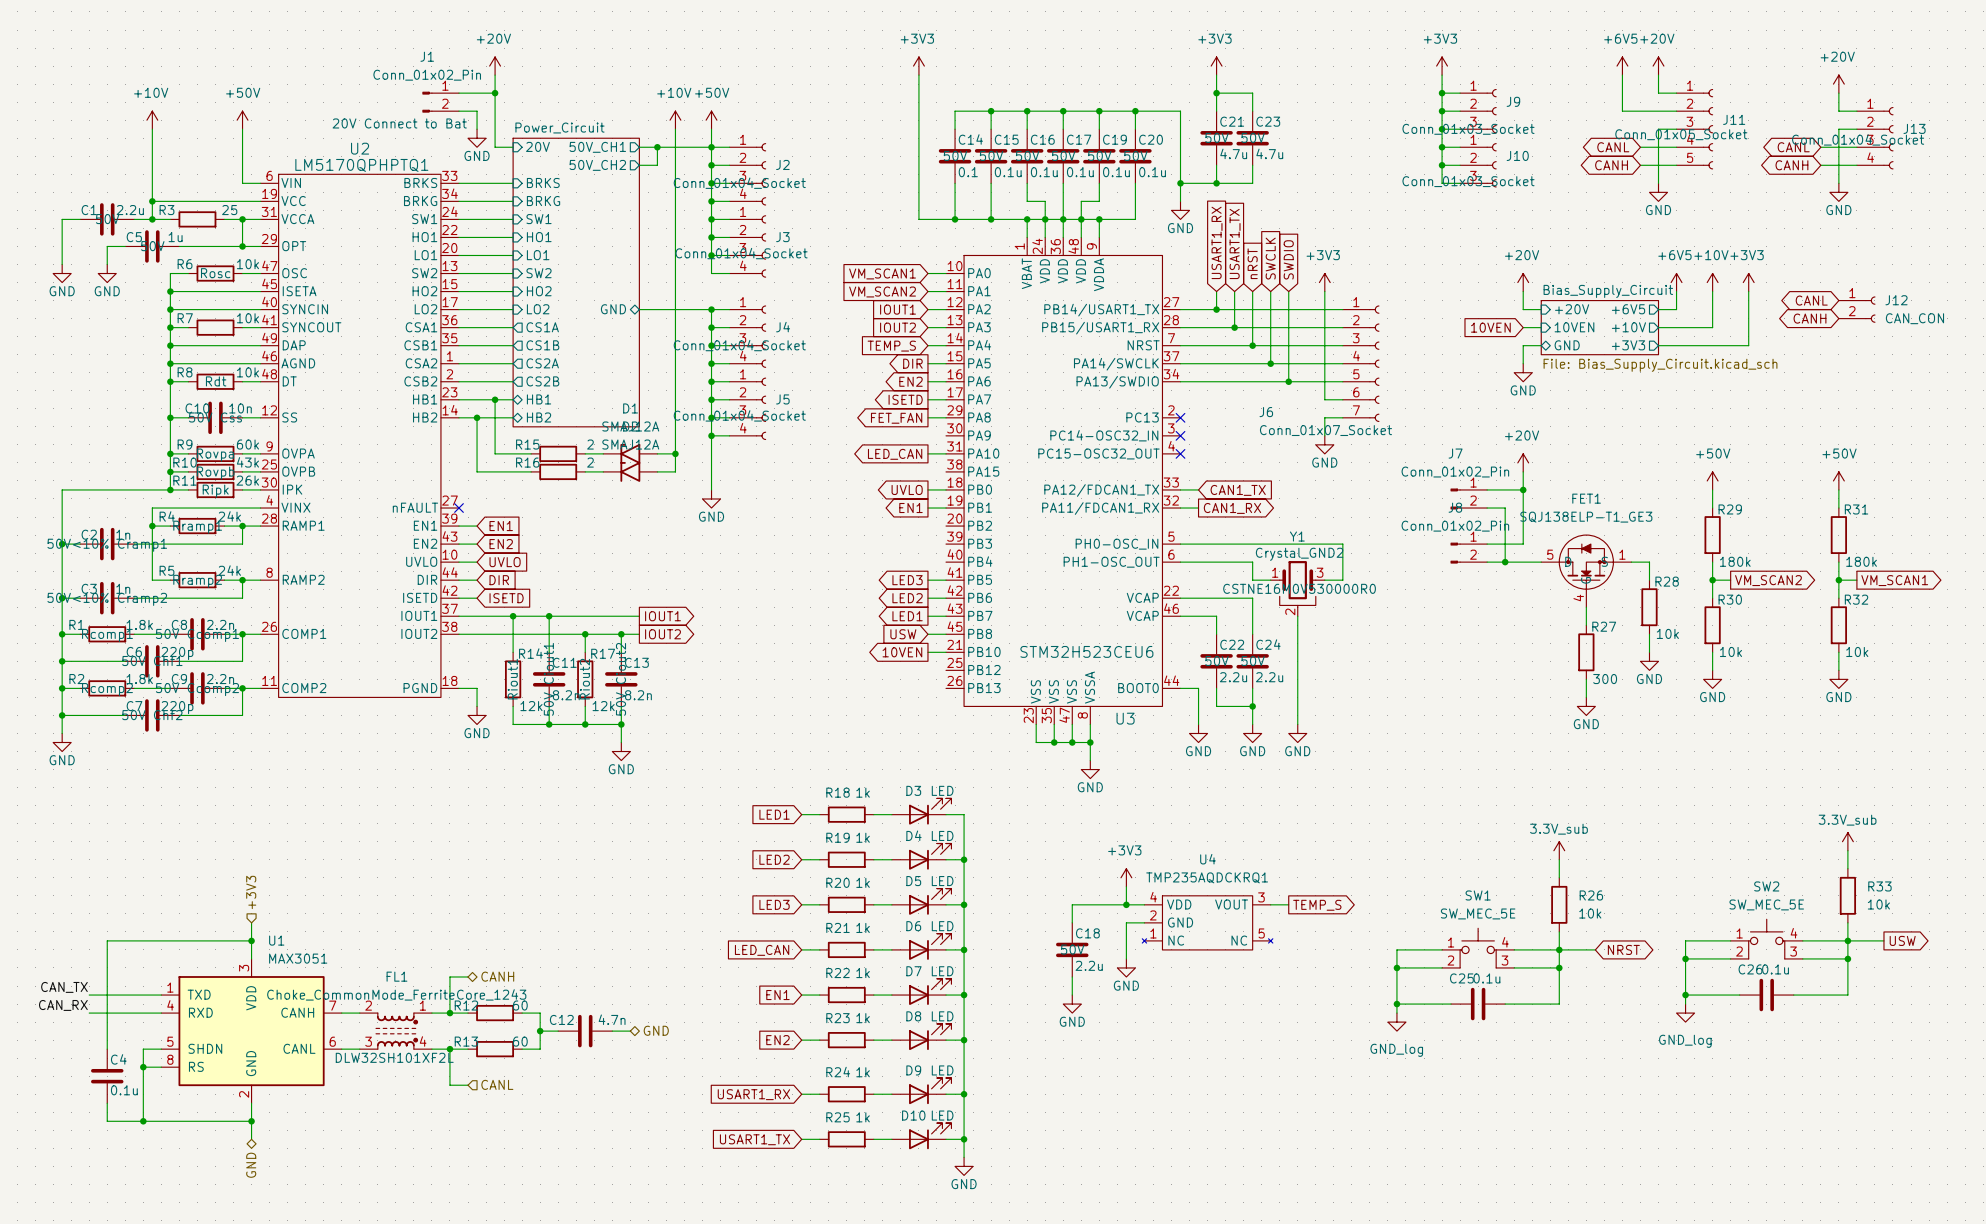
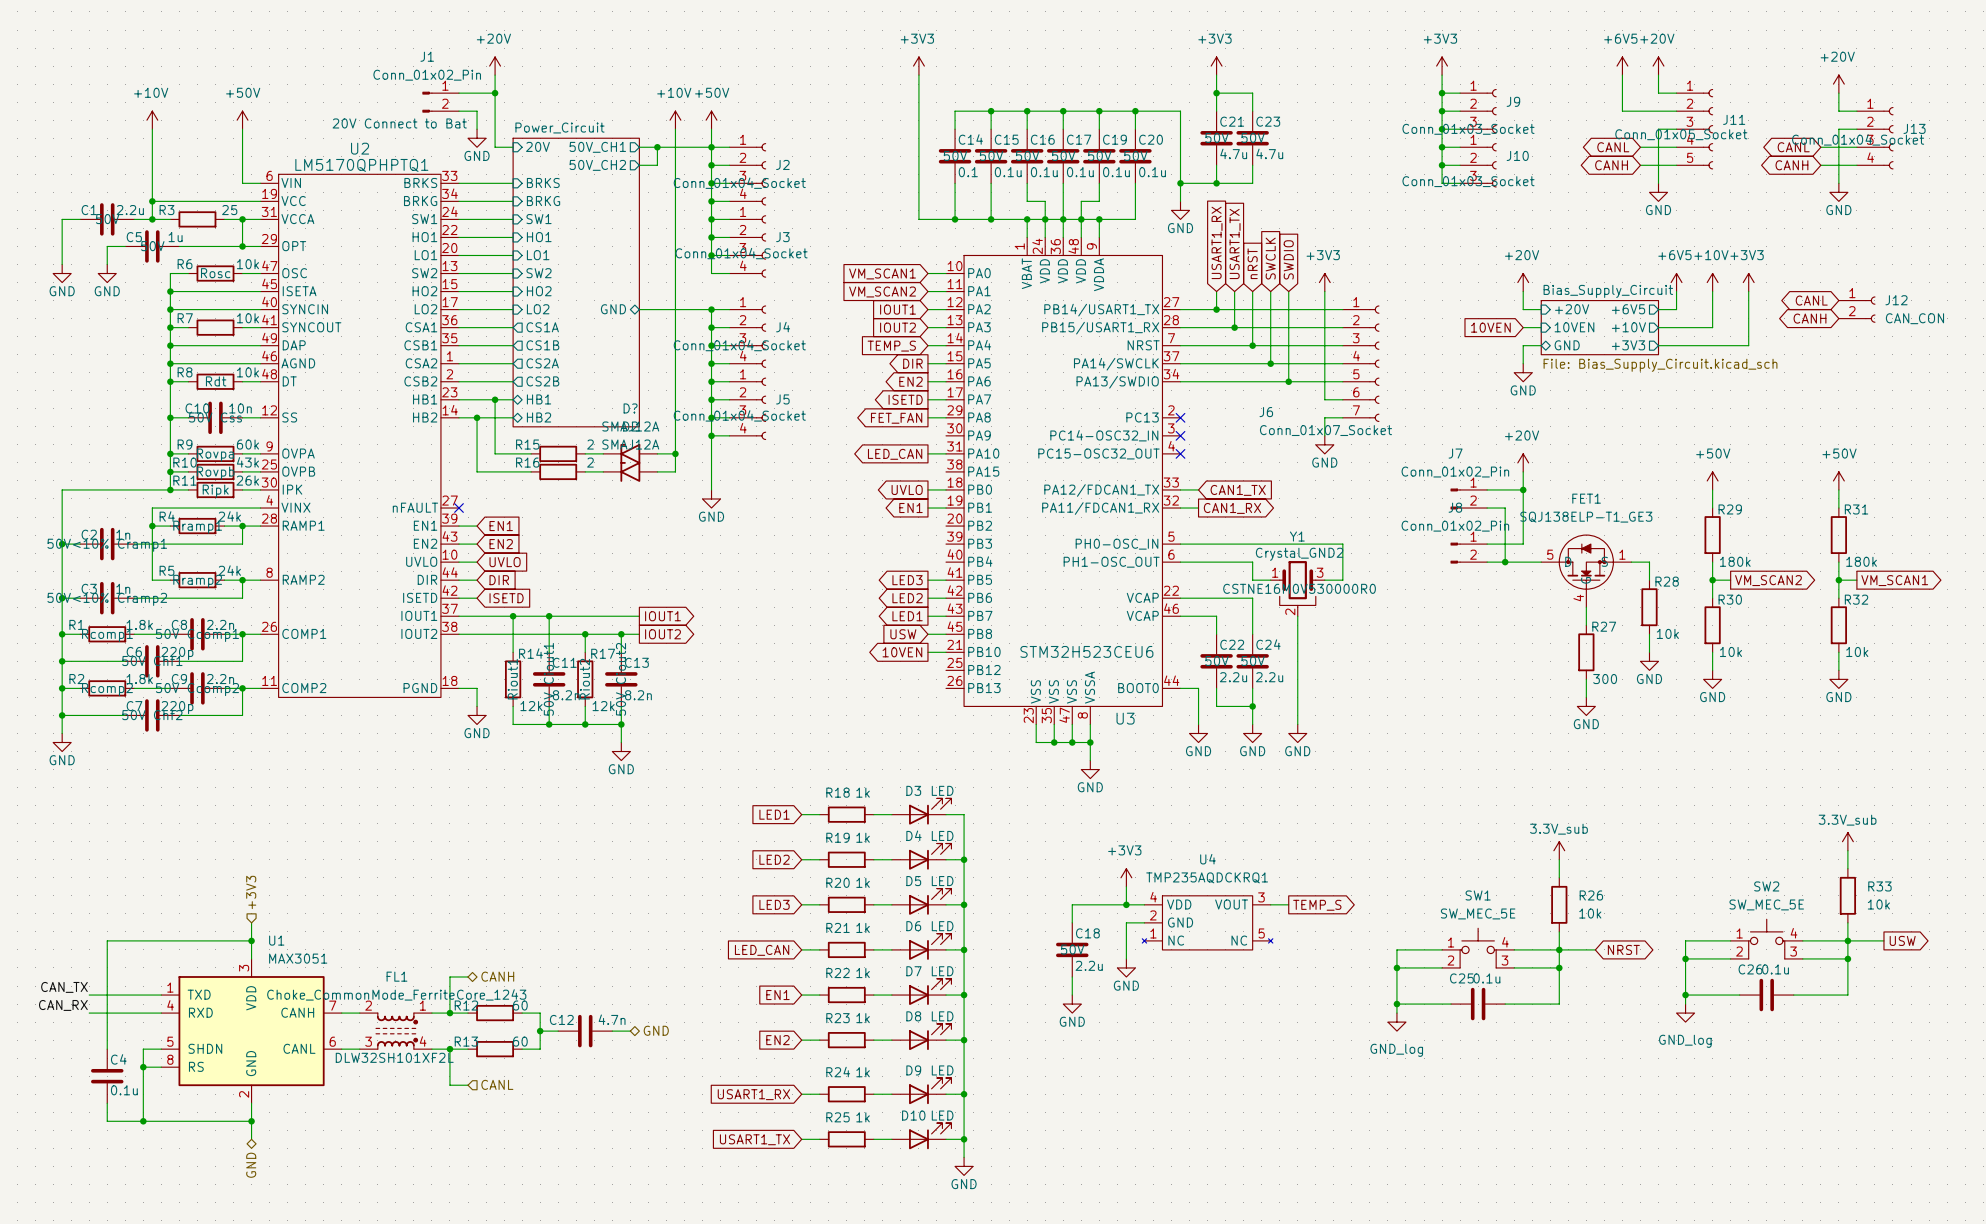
D1 name: D1 (630, 408) -> D? (630, 408)

